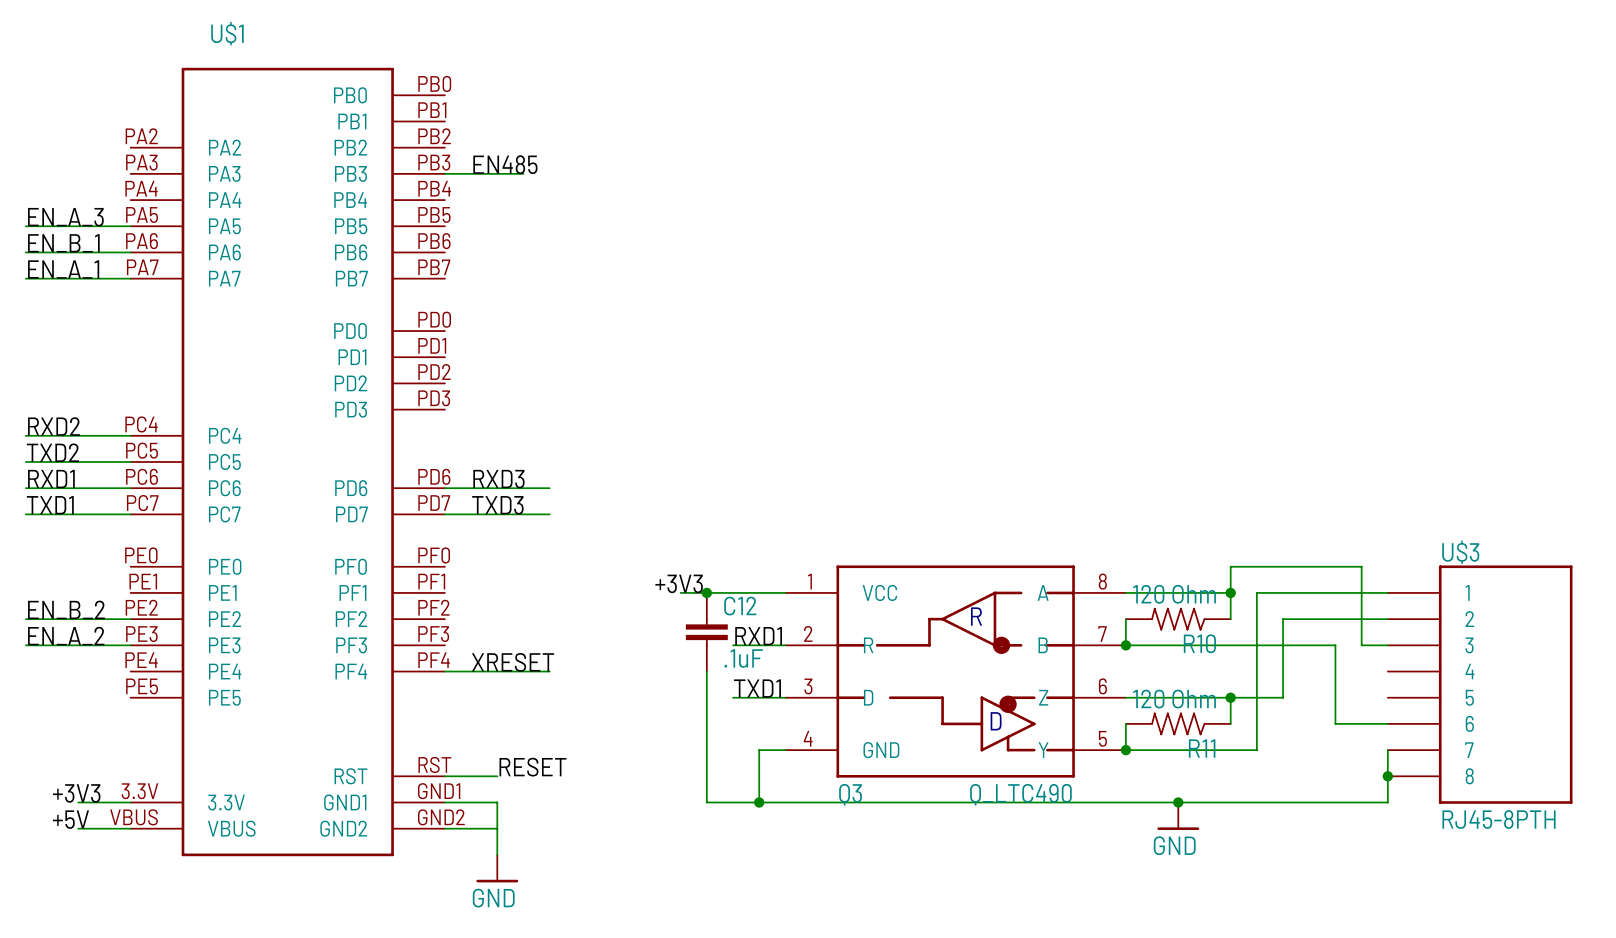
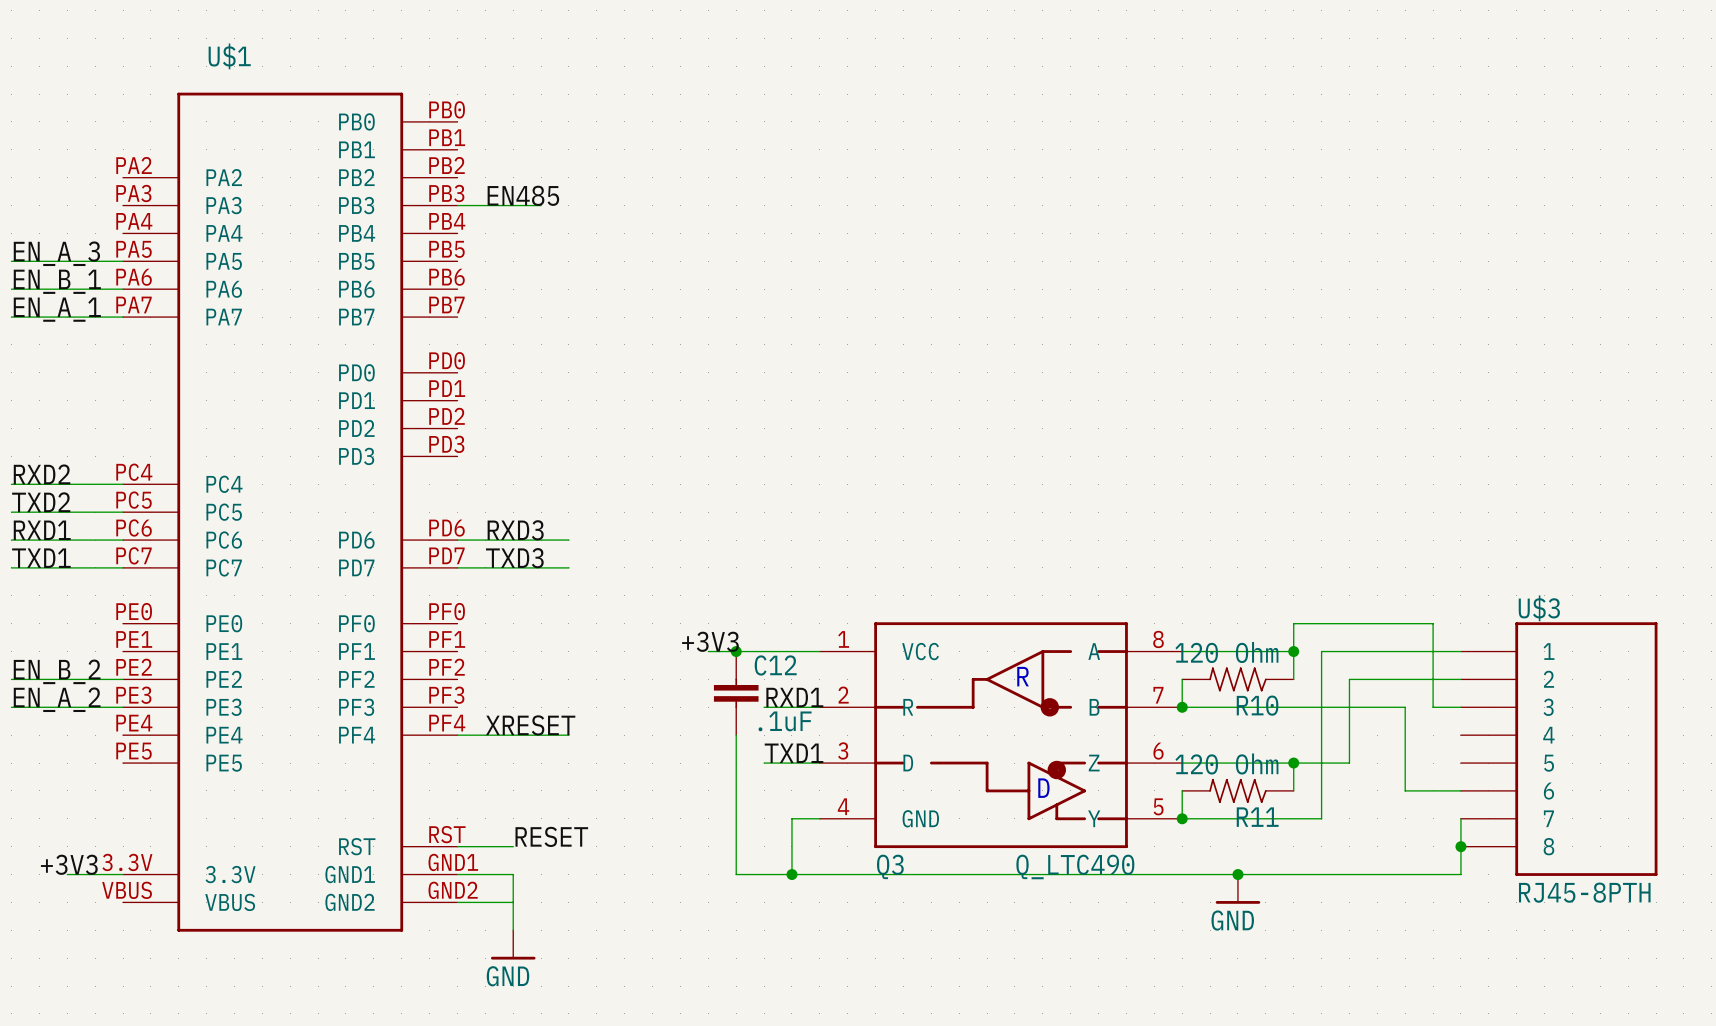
label: +5V (70, 819) -> none
wire: (78, 828) (130, 828) -> none

